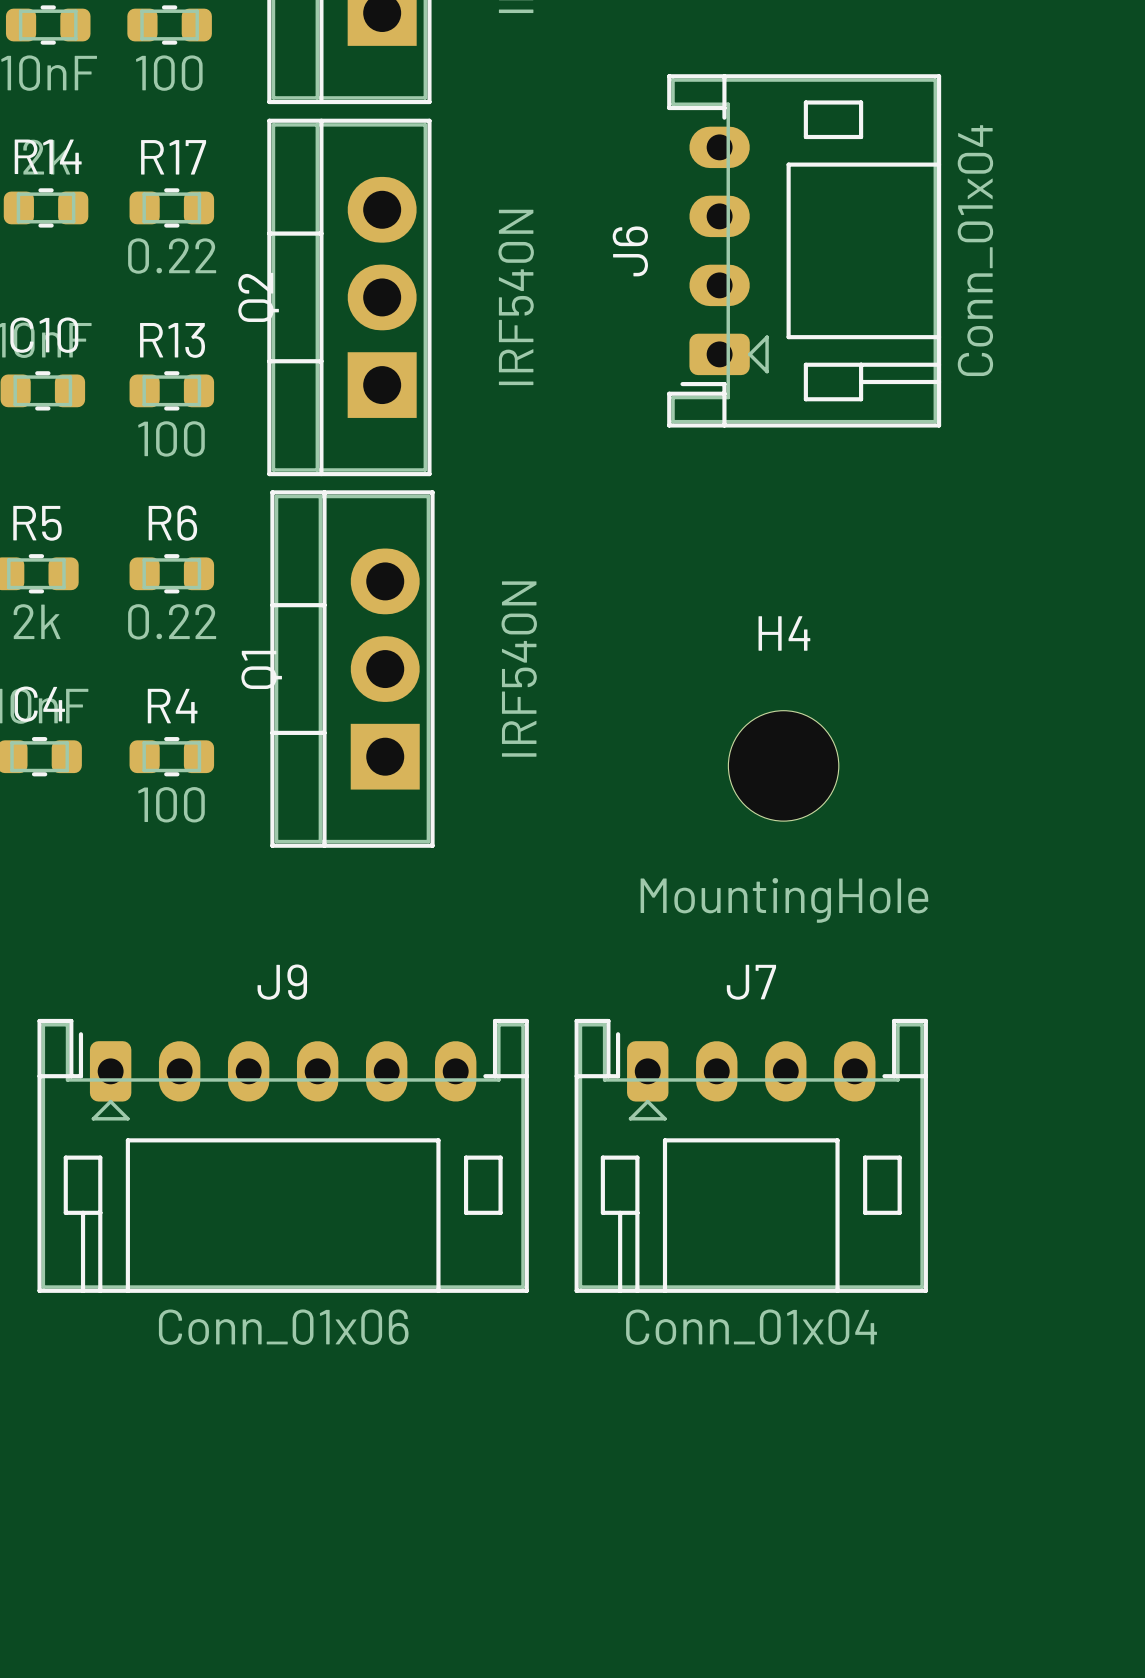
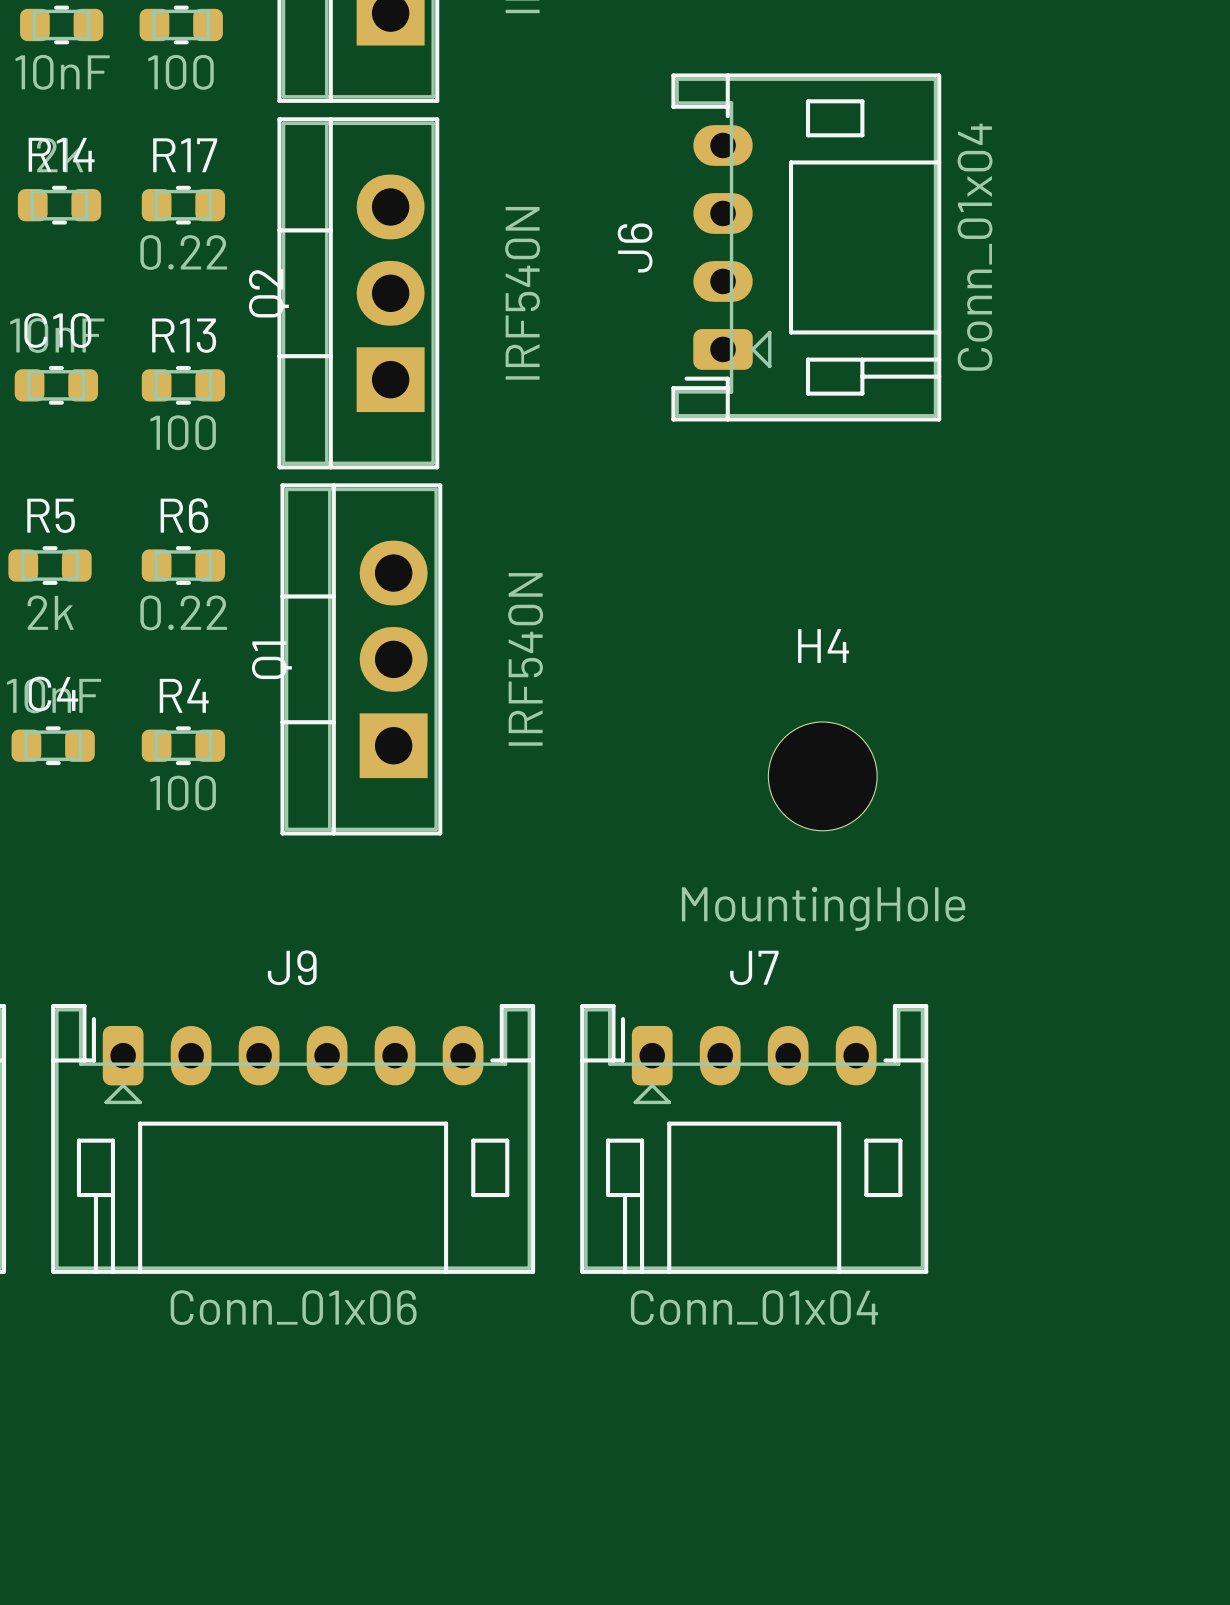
H4 position: (783, 765) -> (822, 776)

